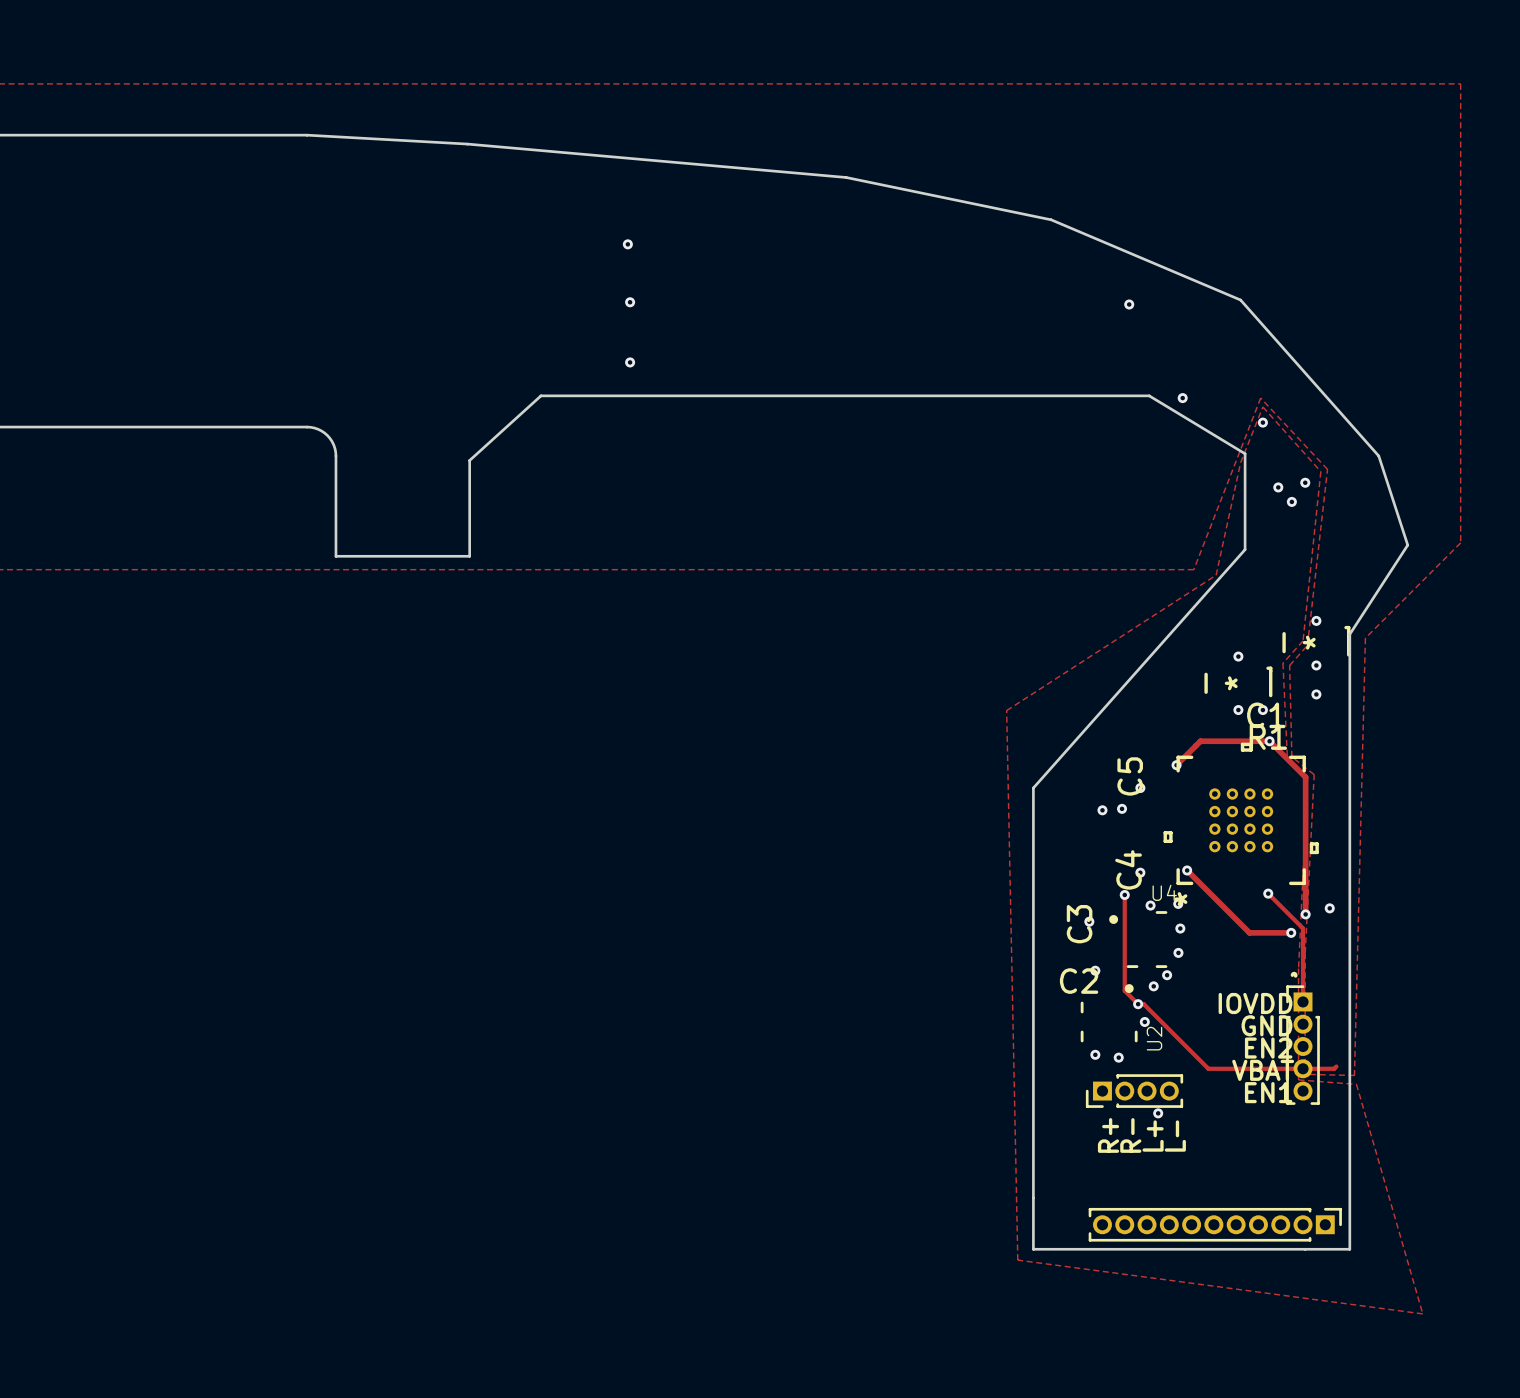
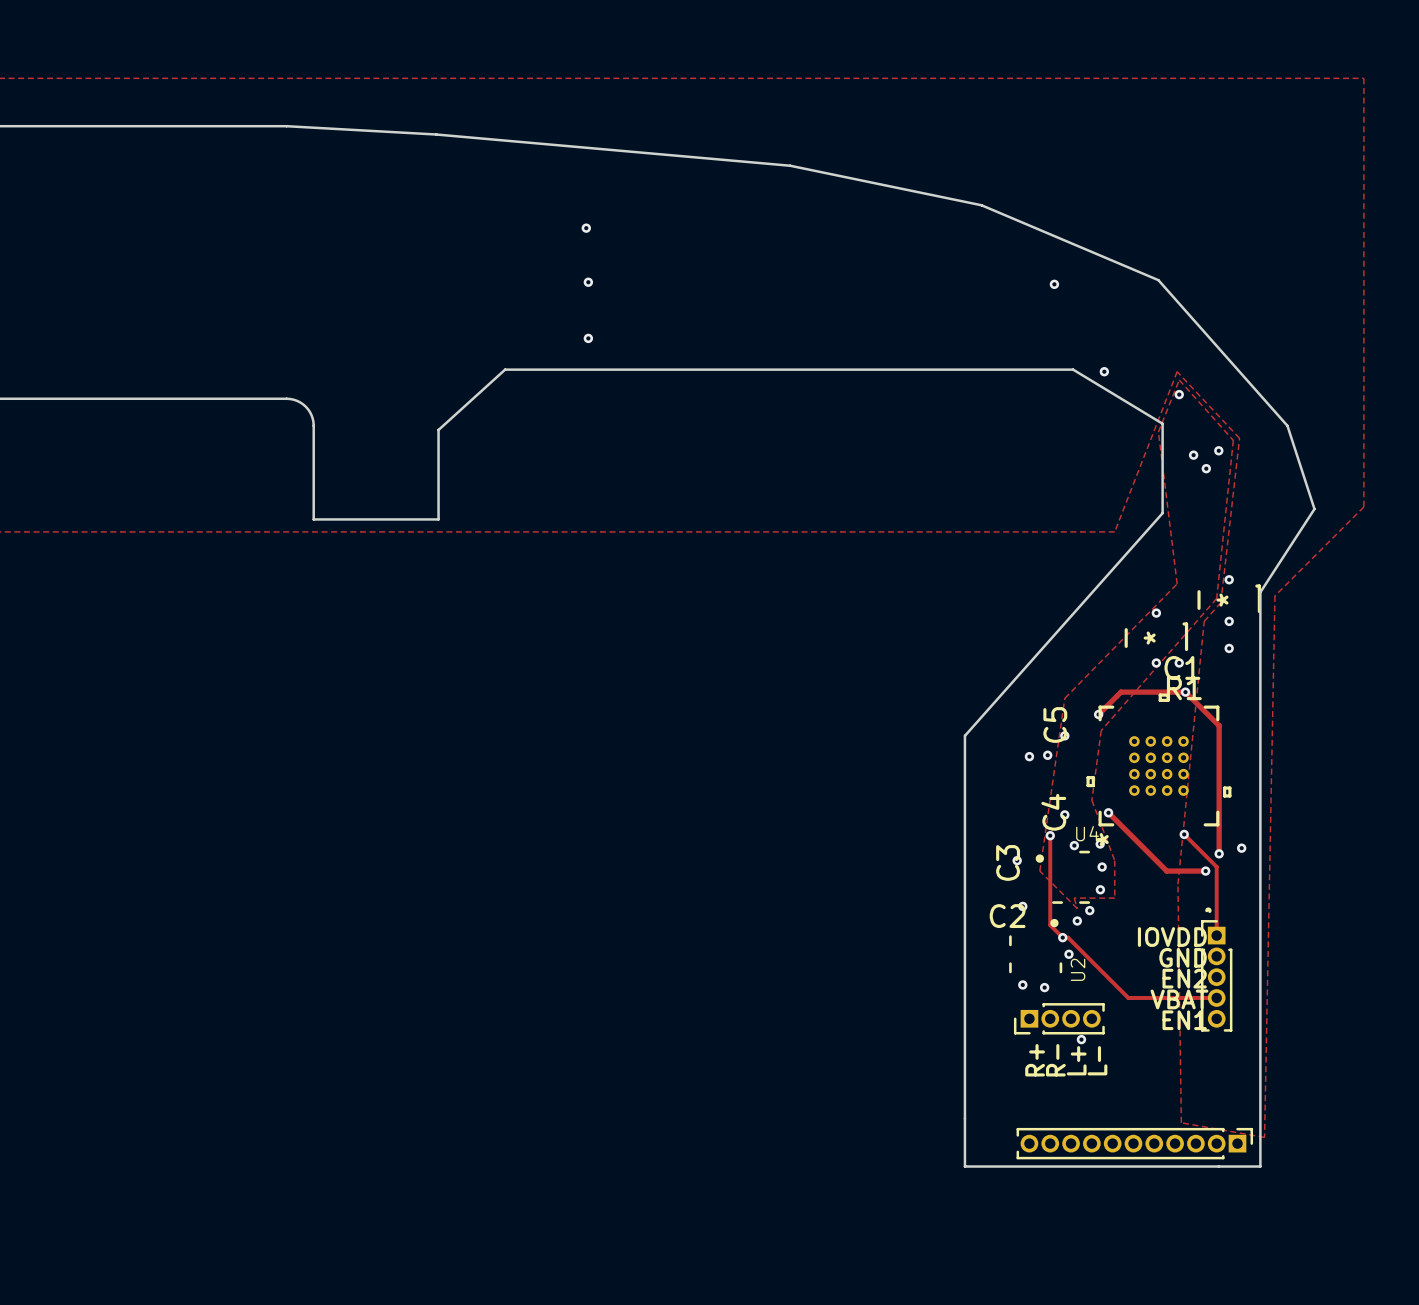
zone outline: (1240, 462) (1216, 575) (1006, 710) (1017, 1260) (1422, 1313) (1356, 1084) (1298, 1079) (1298, 968) (1307, 779) (1287, 759) (1282, 663) (1303, 640) -> (1158, 432) (1177, 583) (1064, 698) (1039, 871) (1077, 908) (1074, 898) (1114, 898) (1114, 860) (1091, 800) (1101, 730) (1216, 598)
zone outline: (1365, 638) (1354, 1075) (1305, 1074) (1305, 952) (1314, 774) (1291, 756) (1289, 665) -> (1274, 595) (1264, 1137) (1181, 1122) (1177, 884) (1204, 621)
track: (1336, 1066) (1334, 1068) (1303, 1068) -> none

